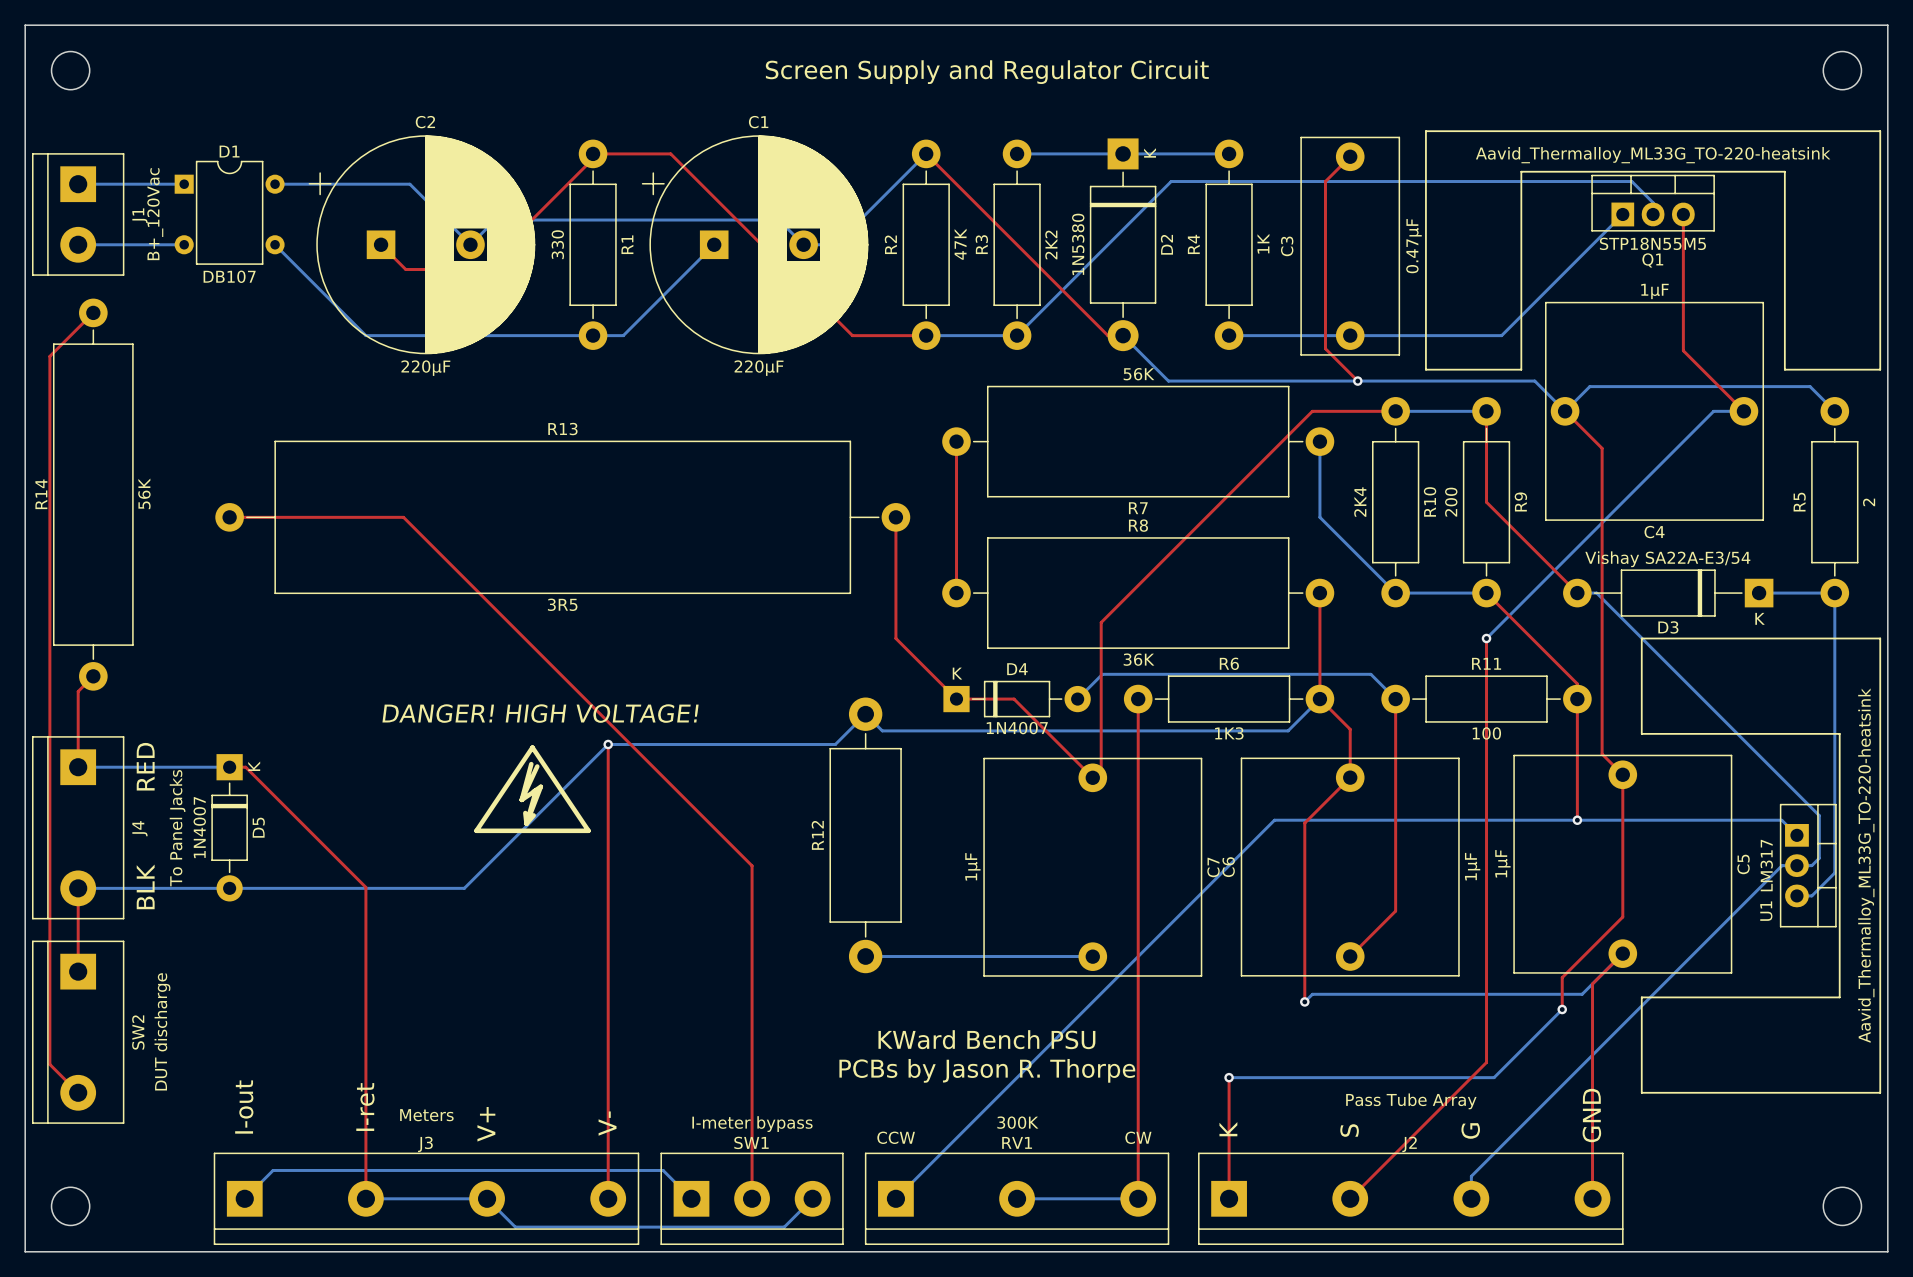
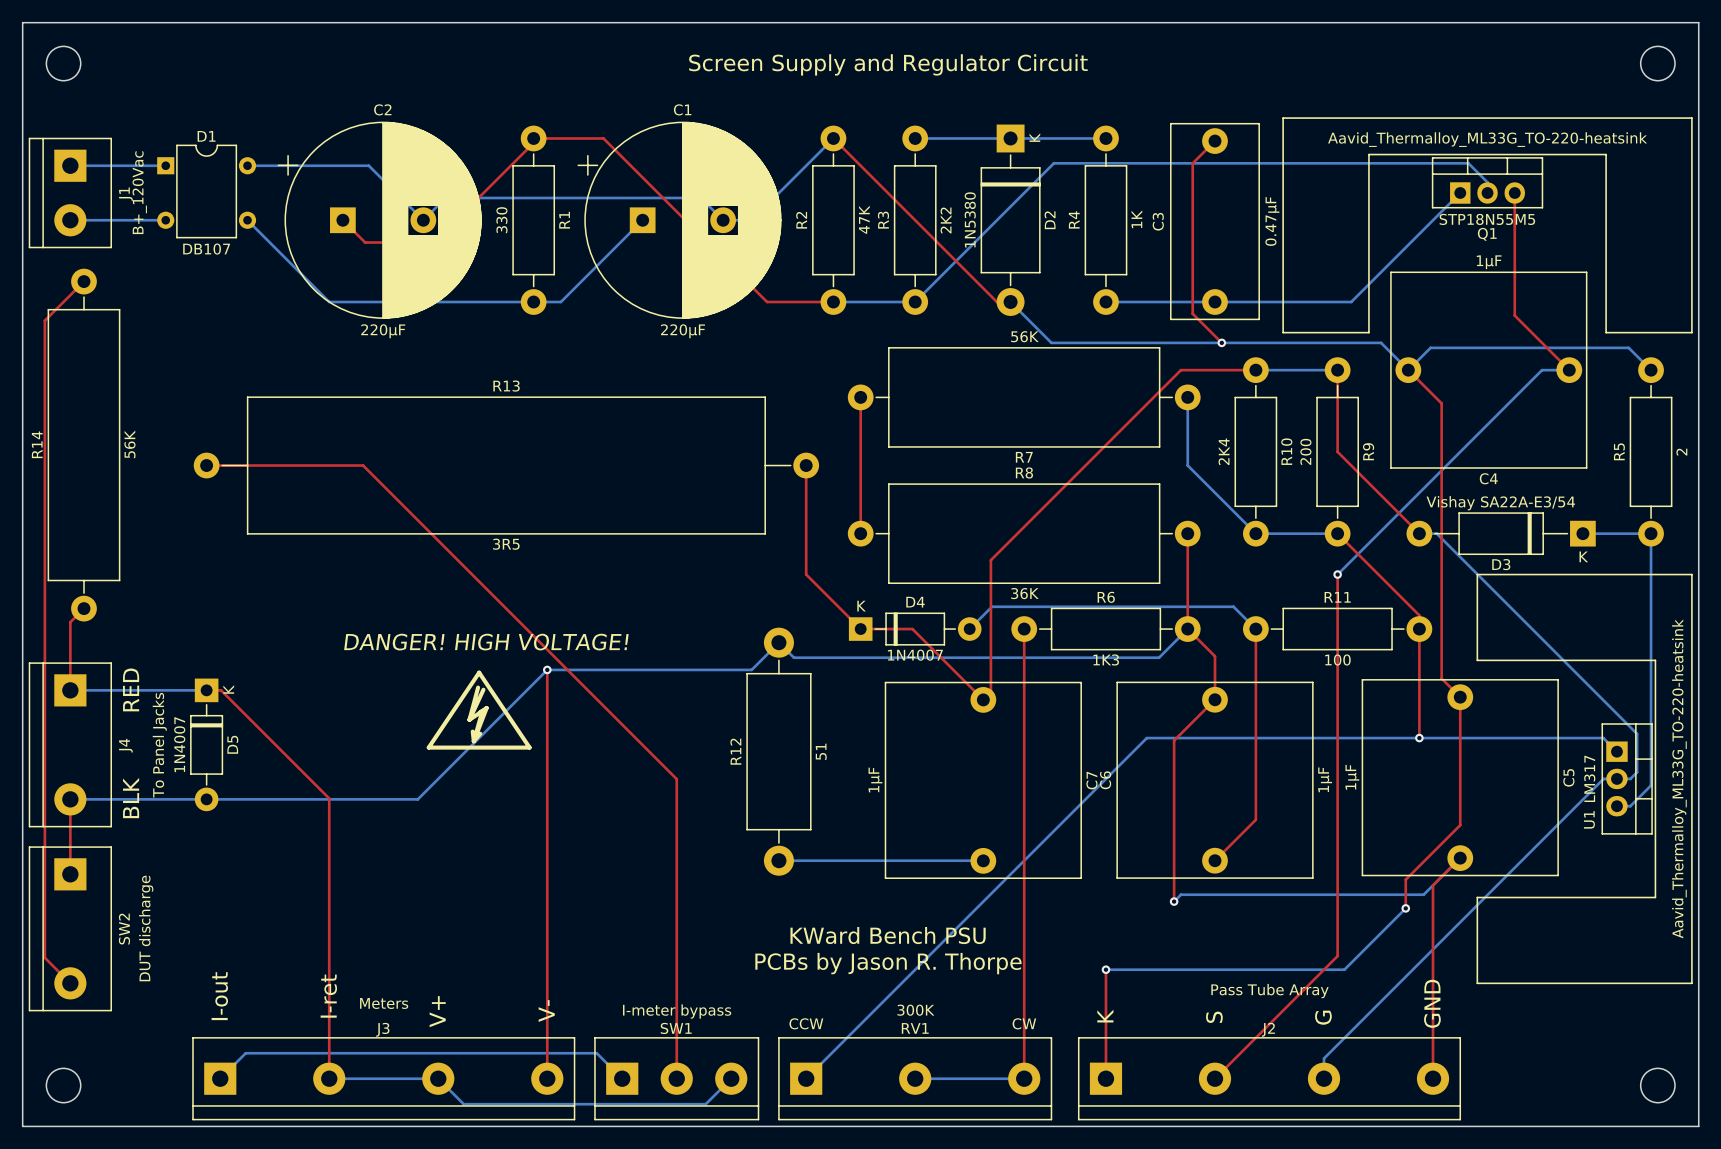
R12 value: none -> 51 (821, 751)

